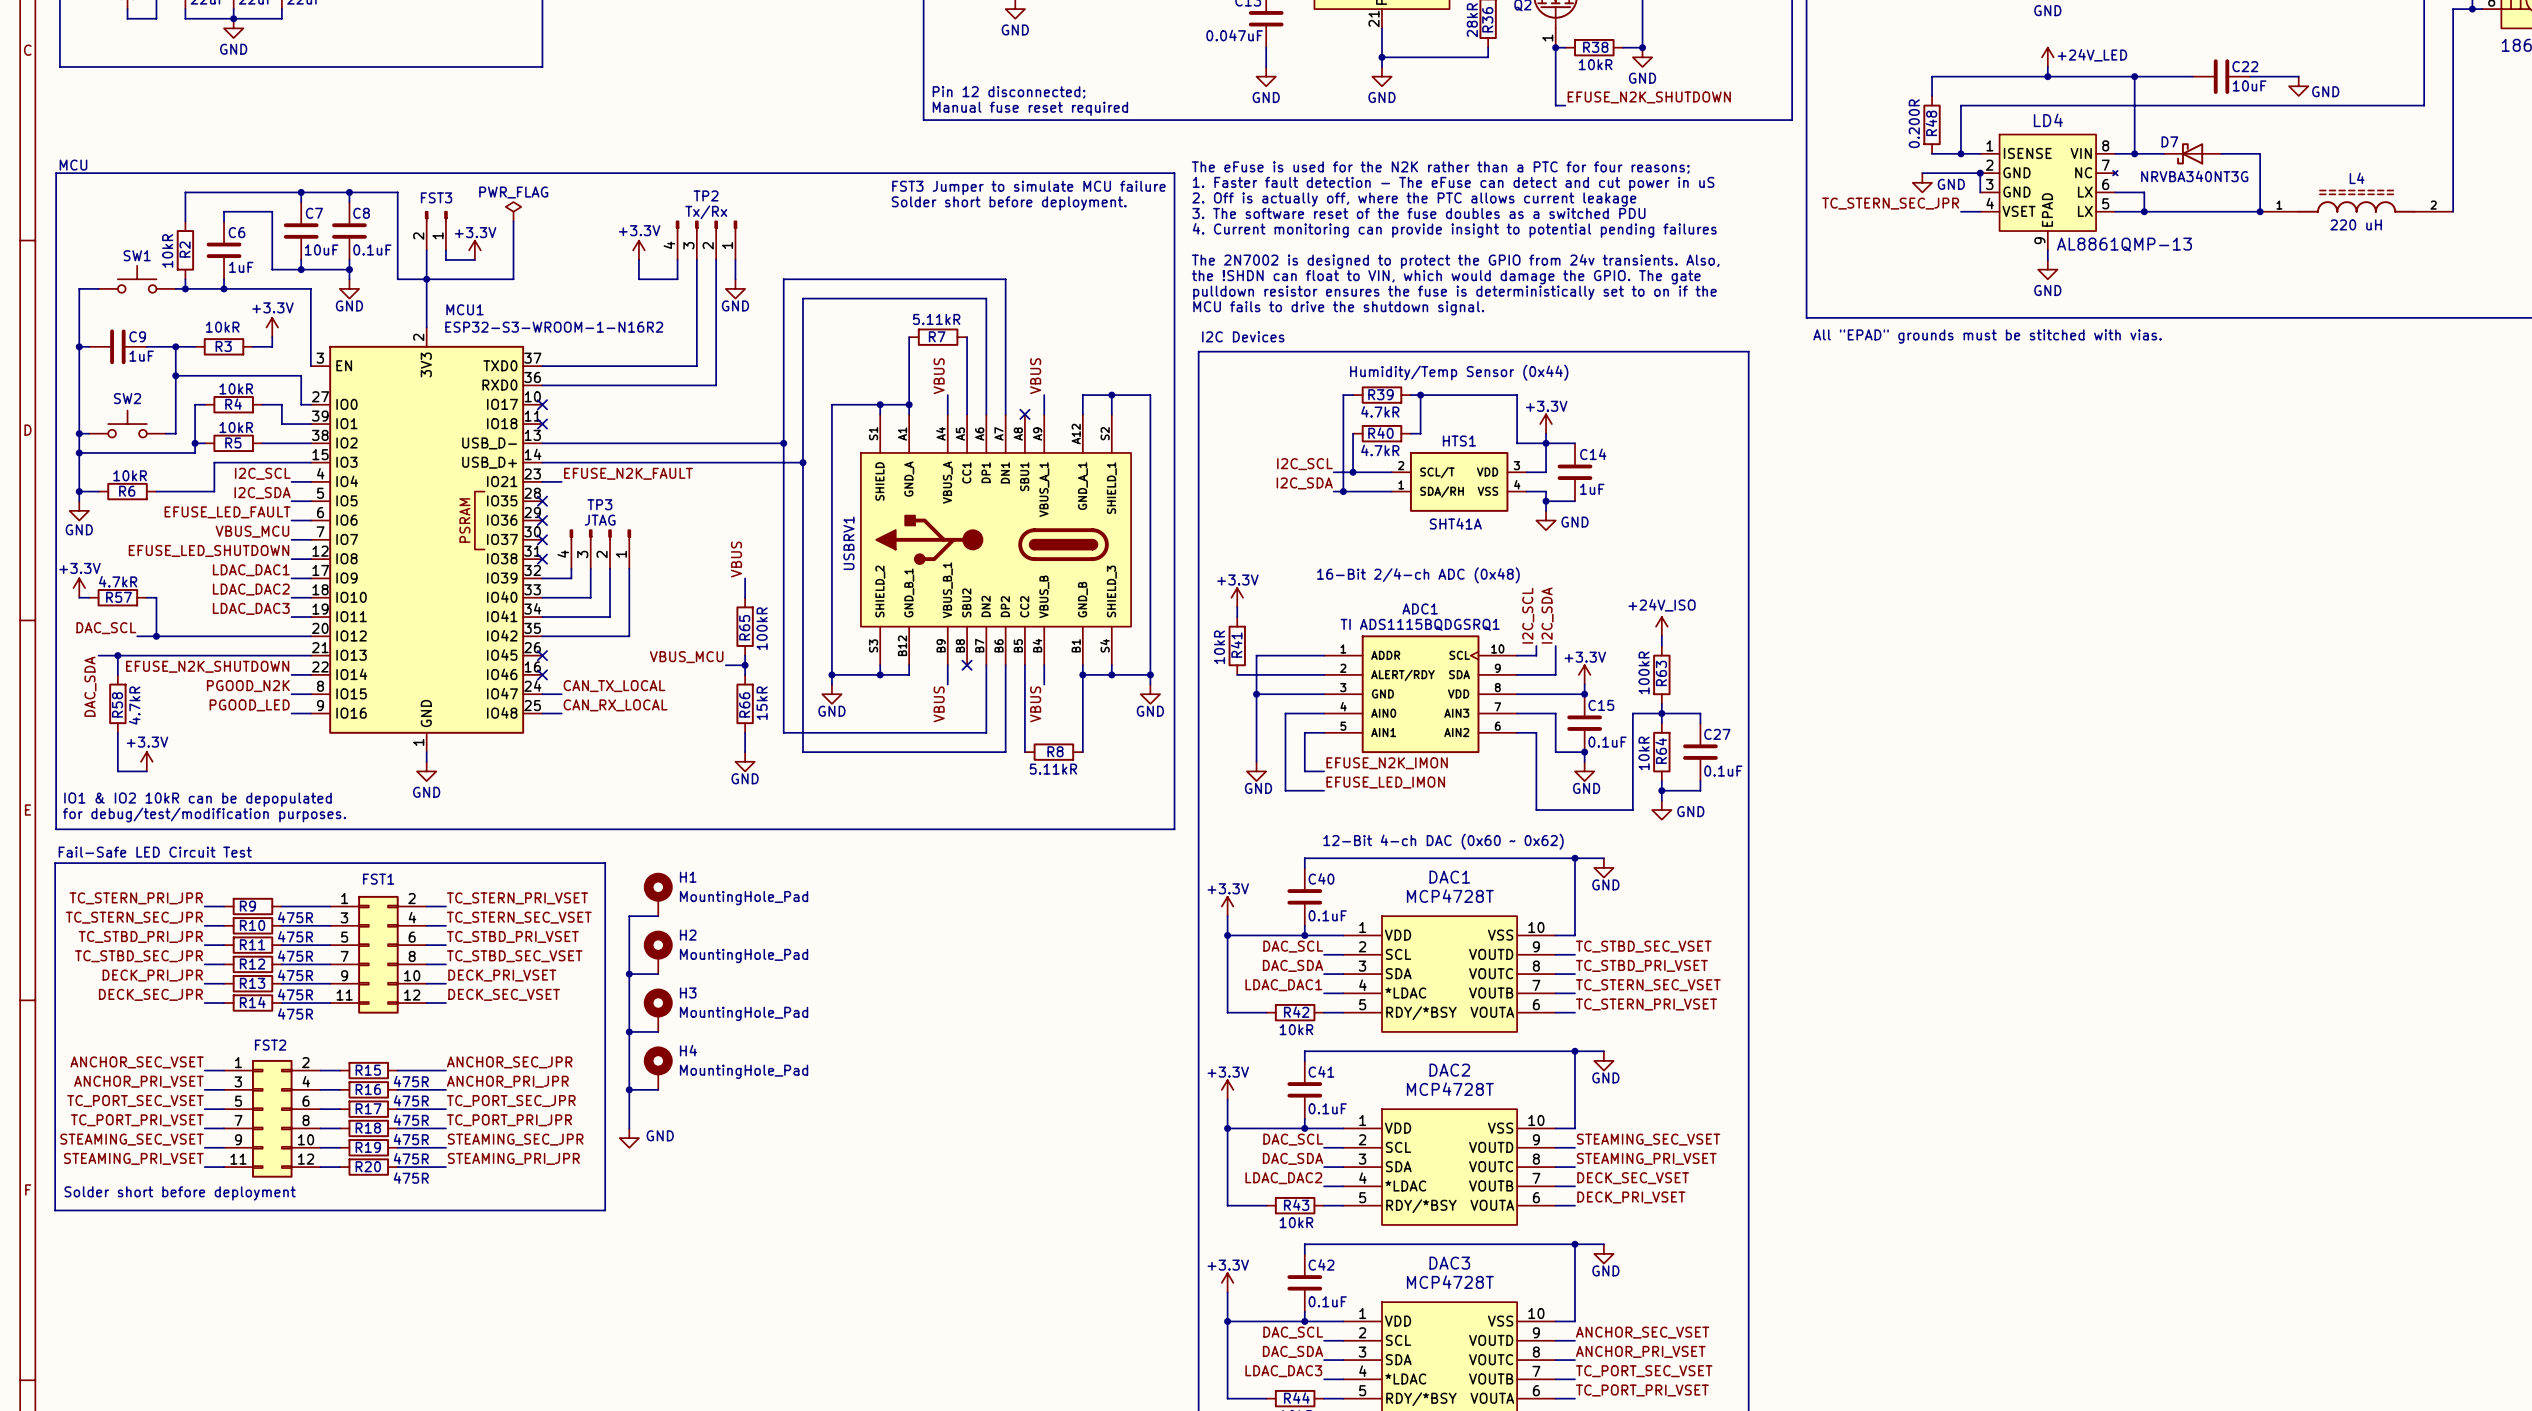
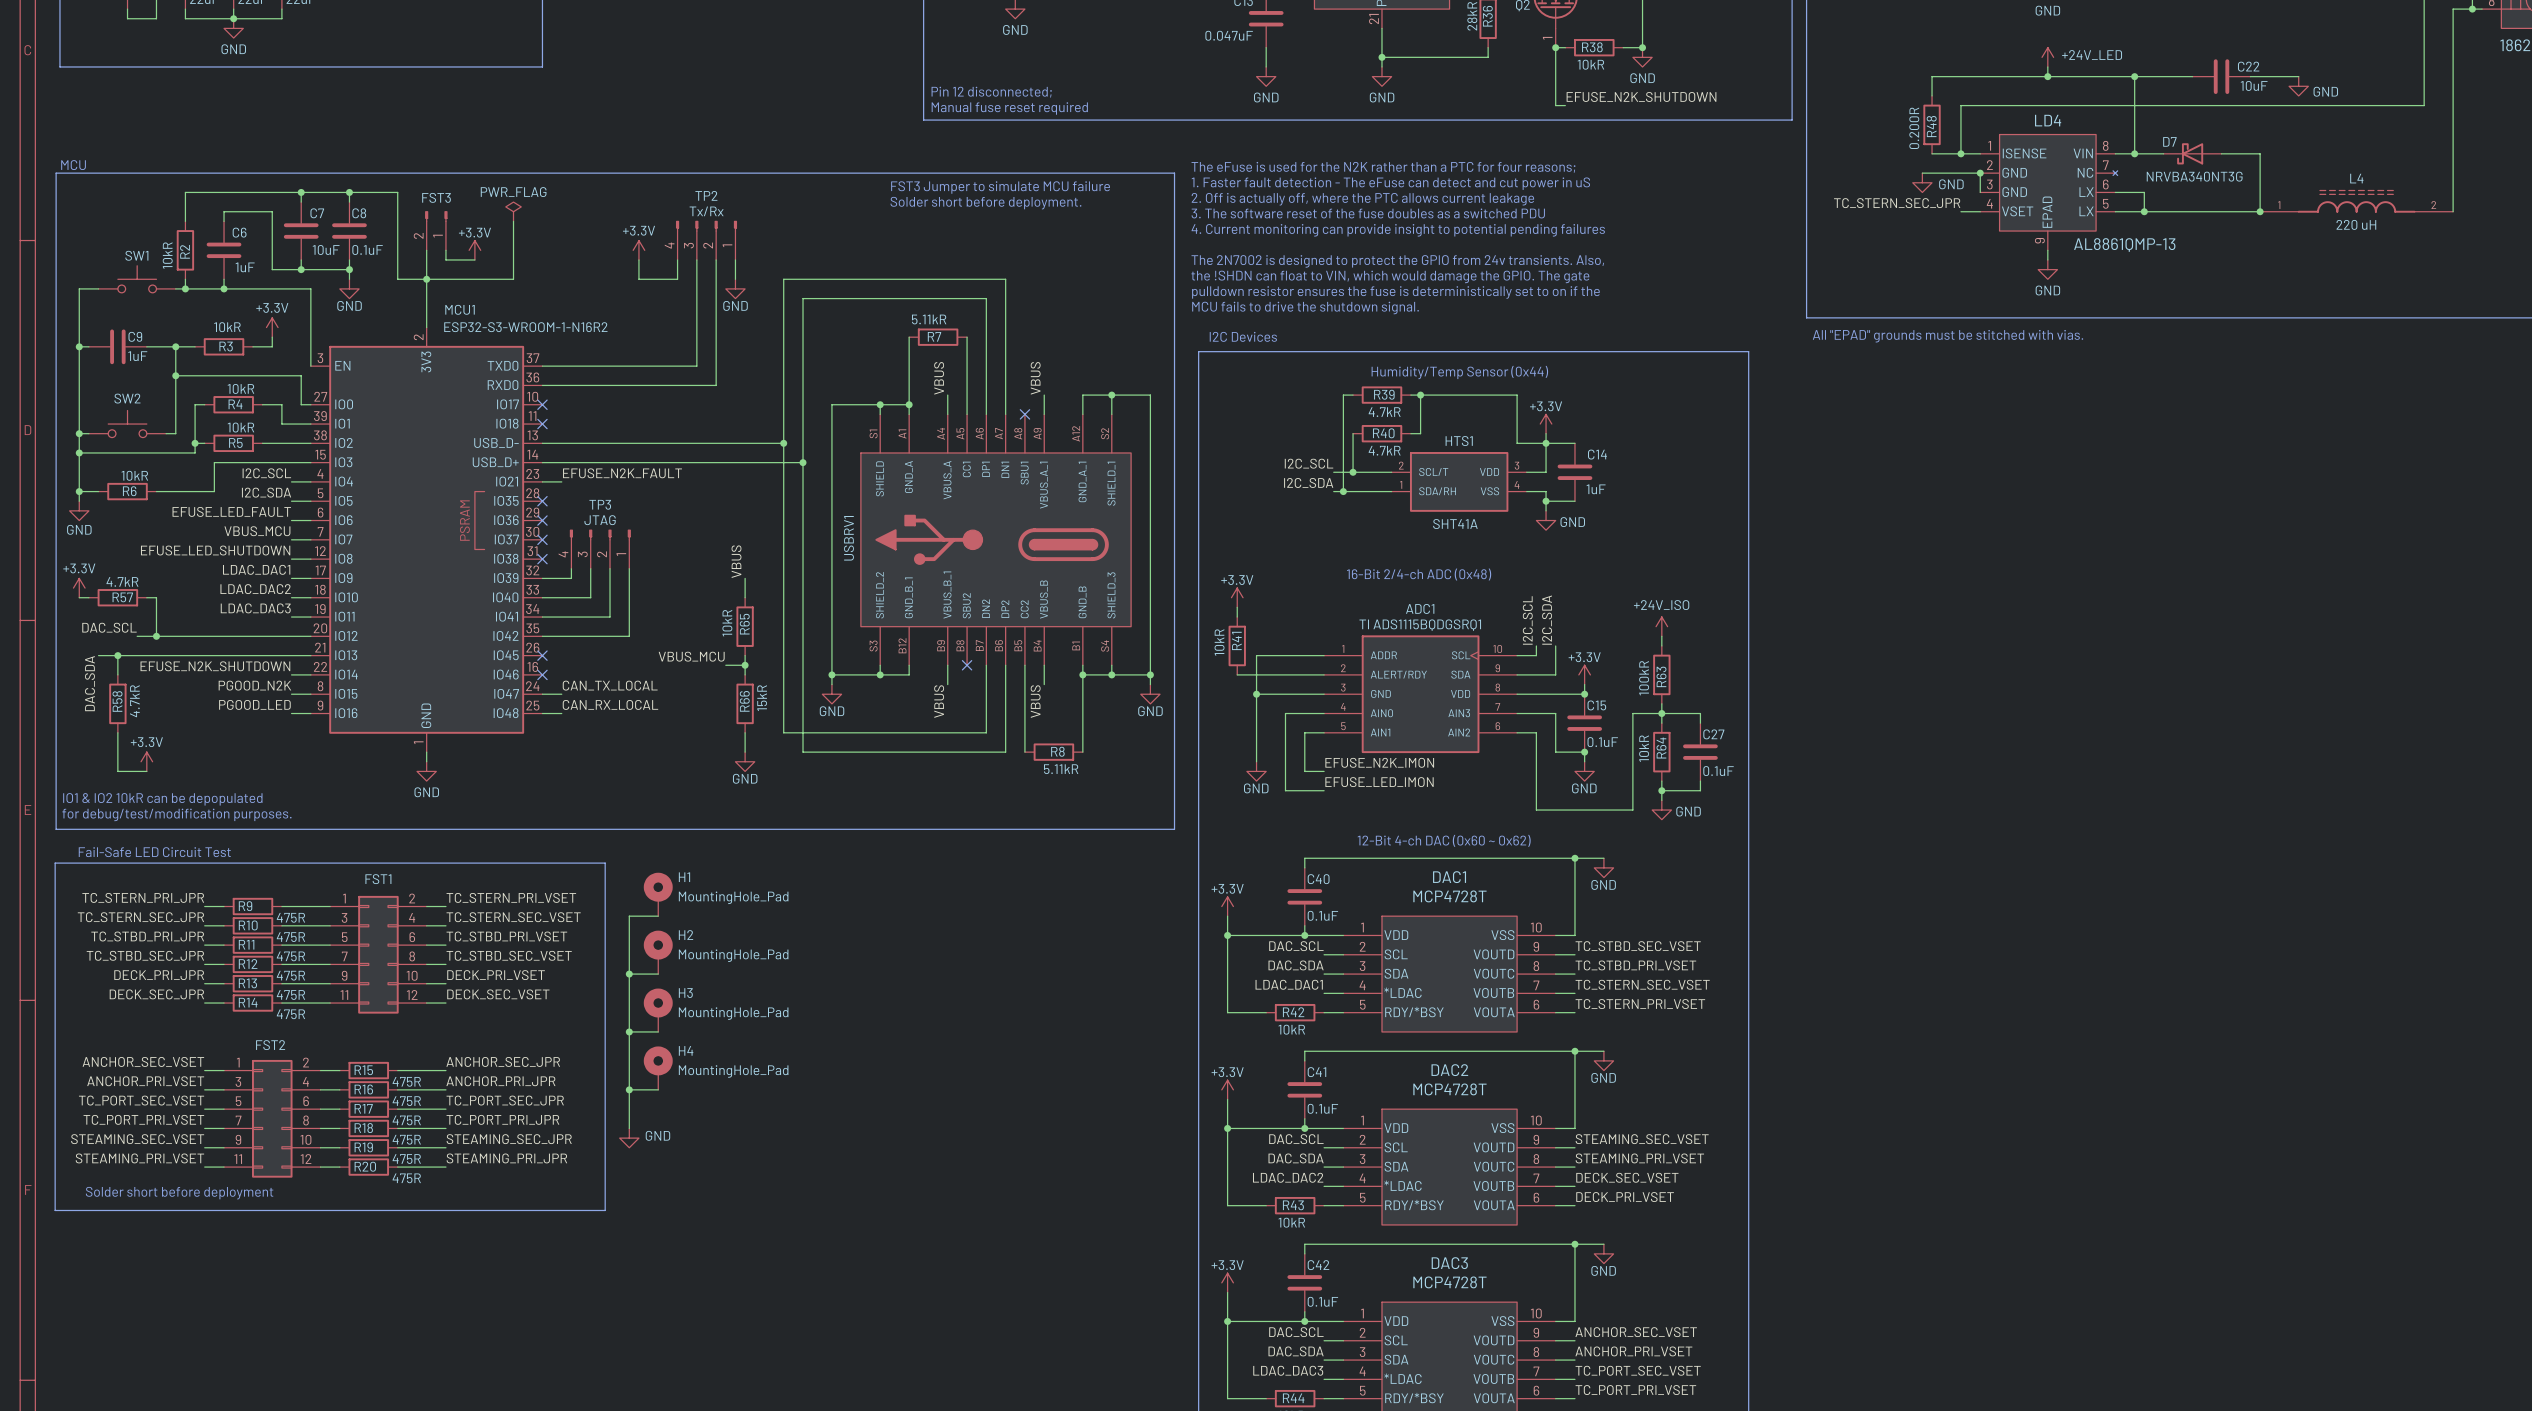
R65 value: 100kR (762, 628) -> 10kR (727, 623)

